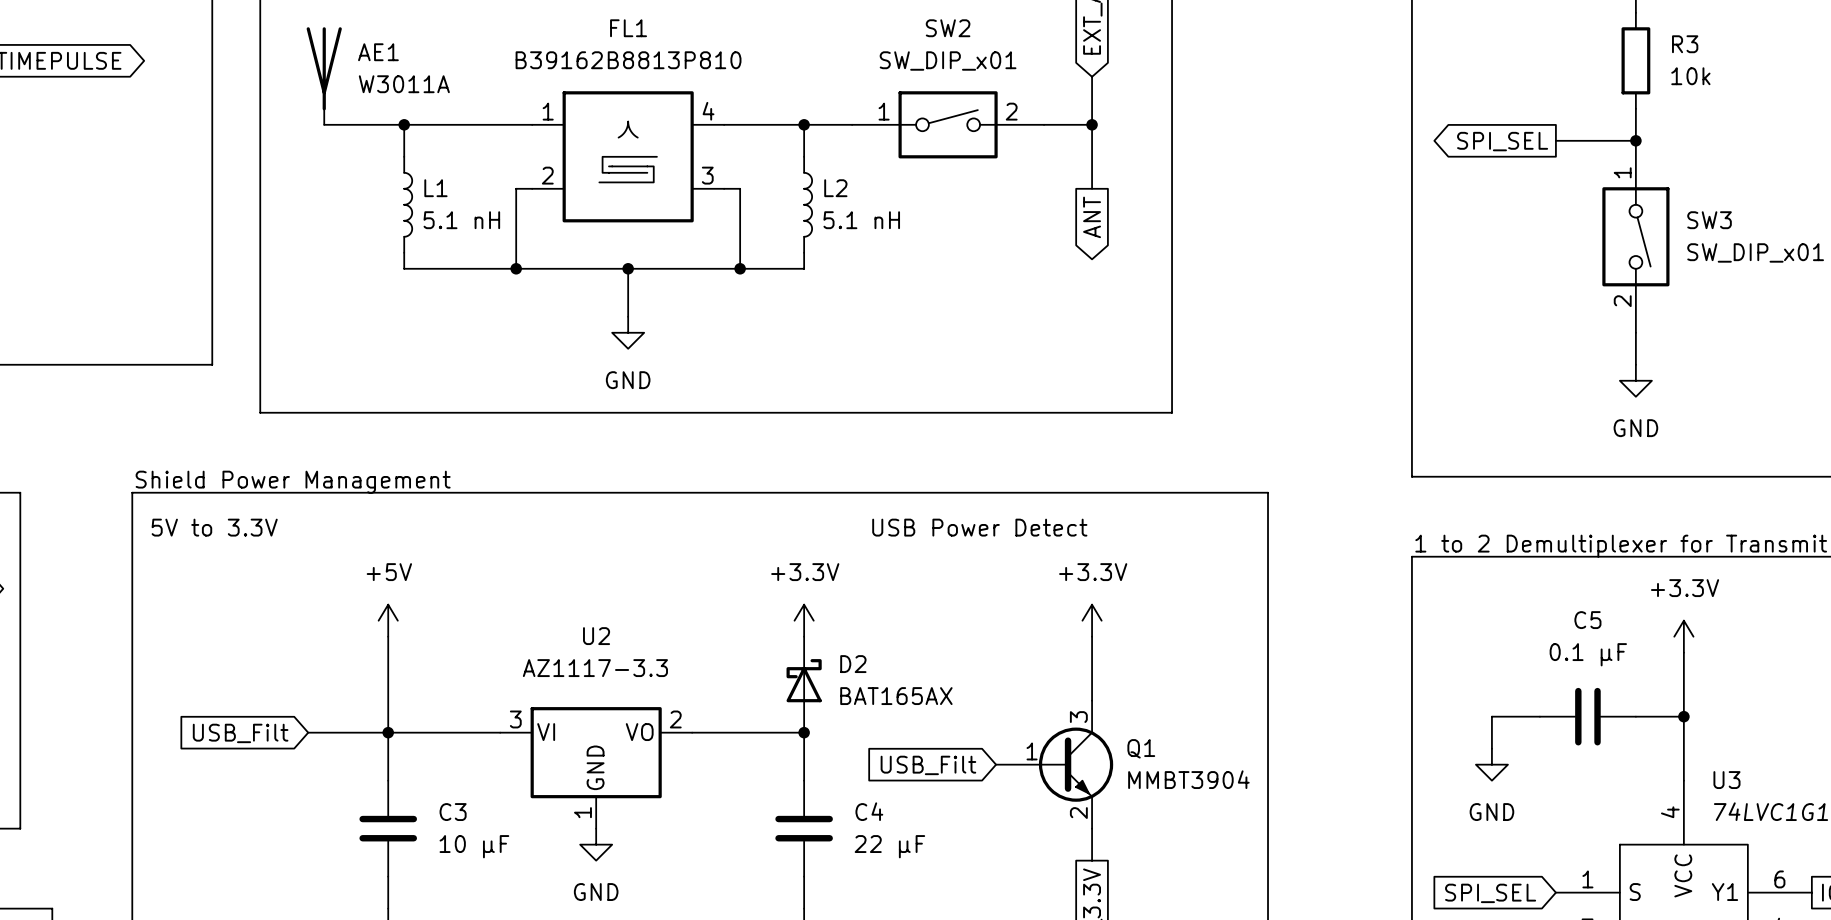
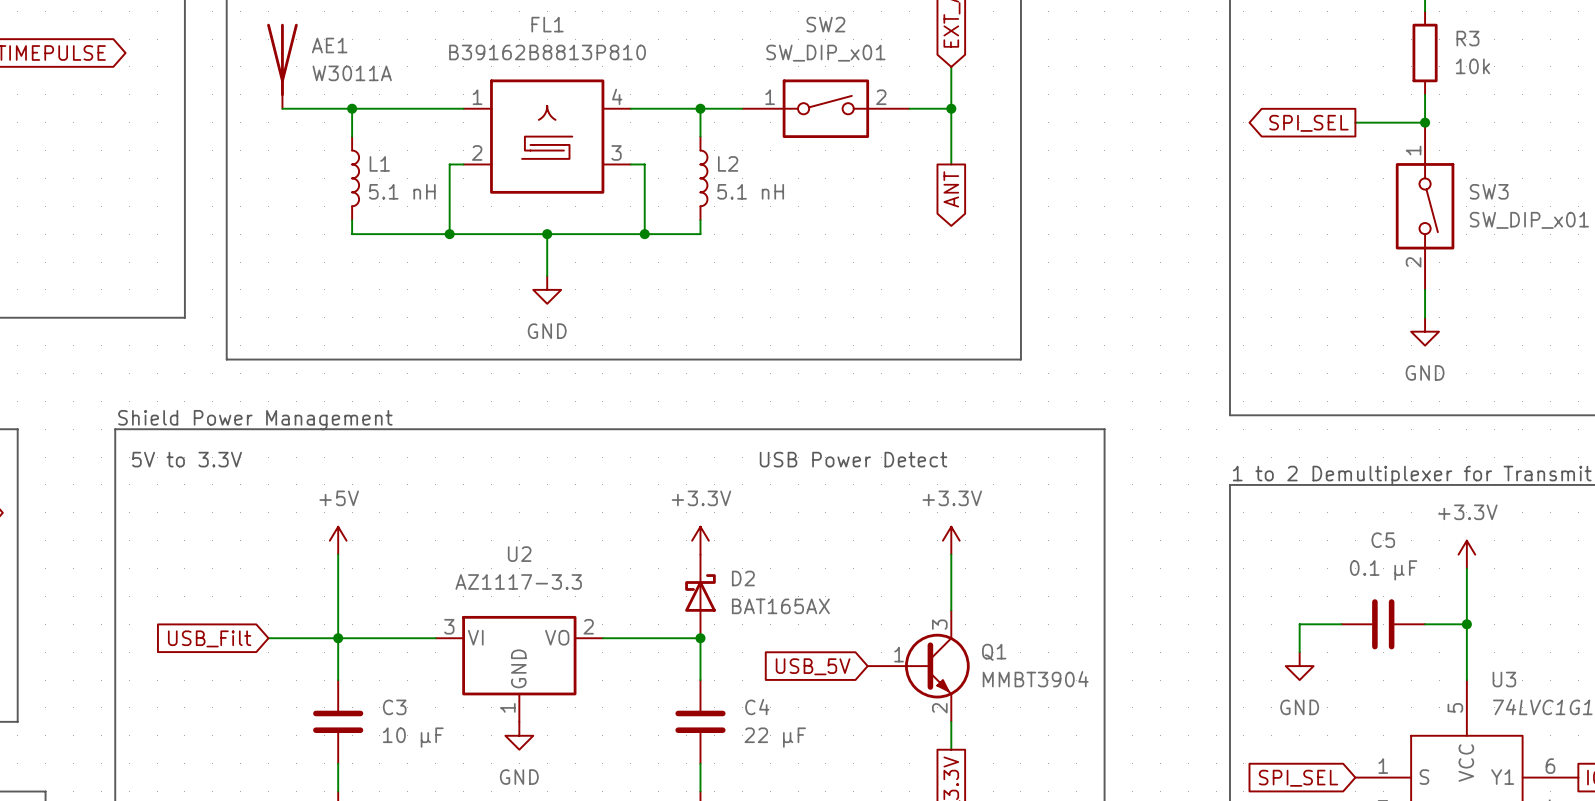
global label: USB_Filt (928, 765) -> USB_5V (813, 666)
U3 pin number: 4 (1670, 812) -> 5 (1455, 707)

